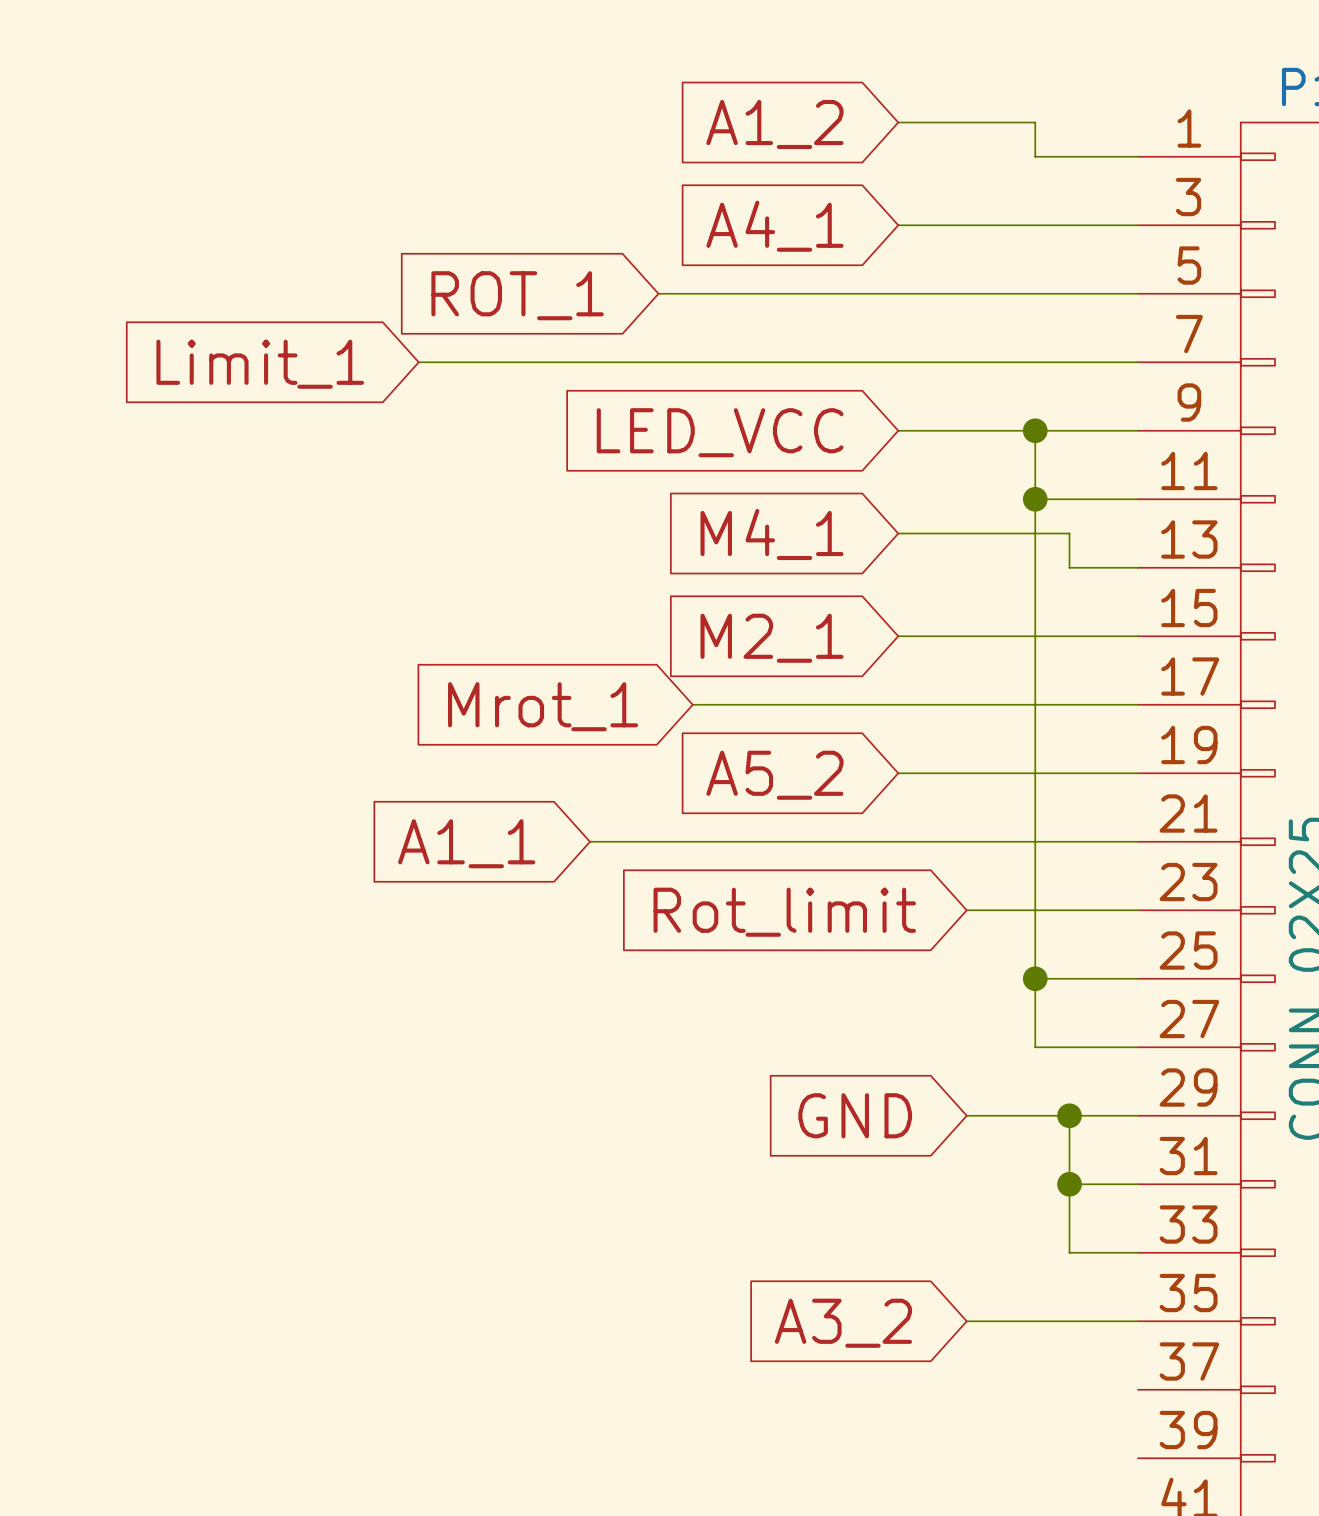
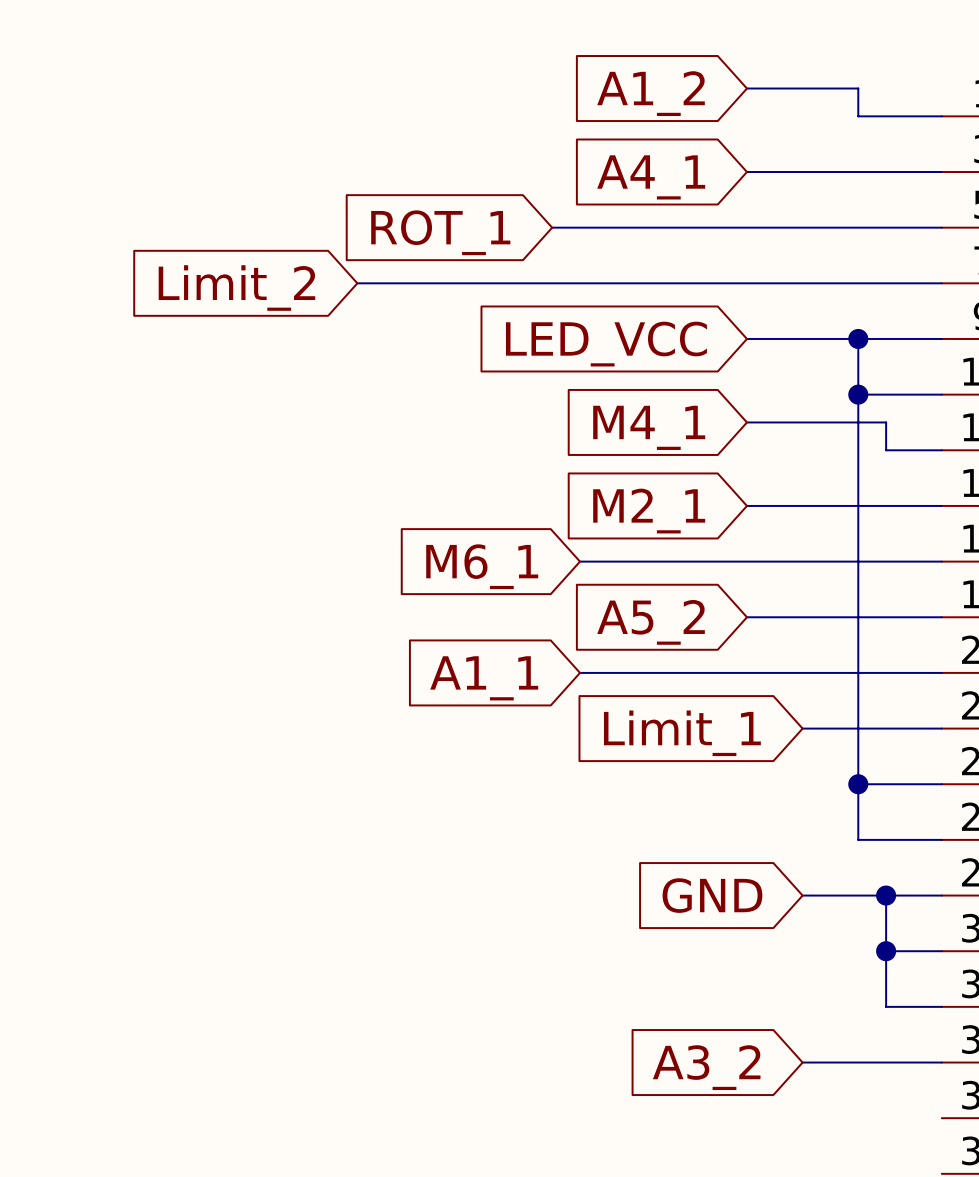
global label: Limit_1 (260, 364) -> Limit_2 (236, 288)
global label: Mrot_1 (543, 706) -> M6_1 (482, 566)
wire: (590, 841) (692, 841) -> none
global label position: A1_1 (466, 843) -> A1_1 (484, 678)
global label: Rot_limit (784, 912) -> Limit_1 (682, 733)

